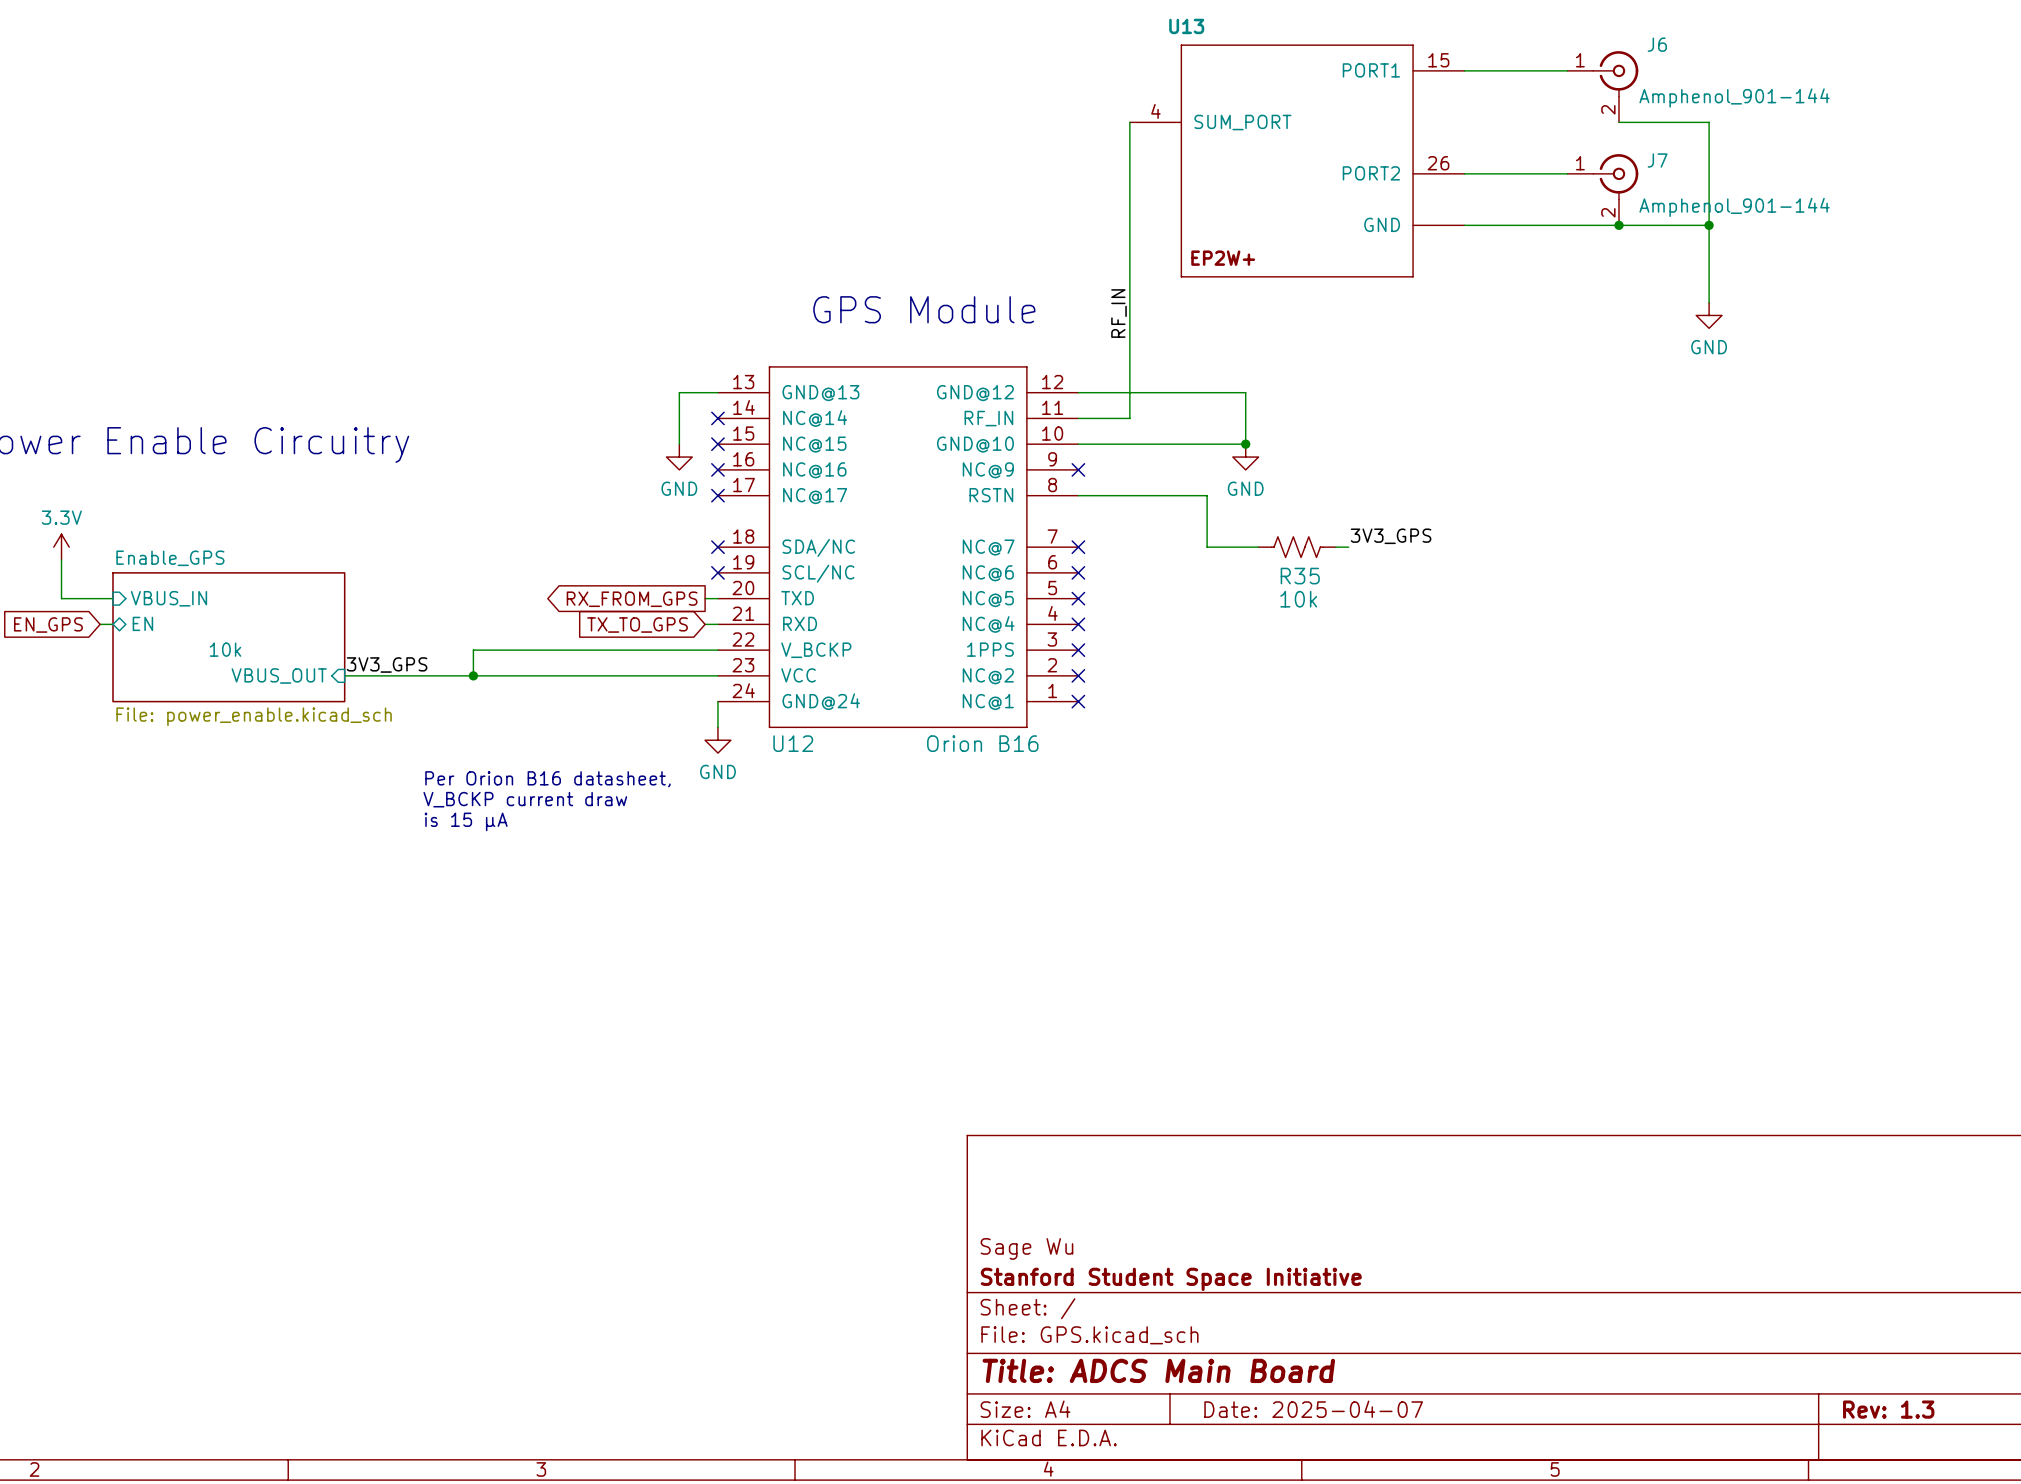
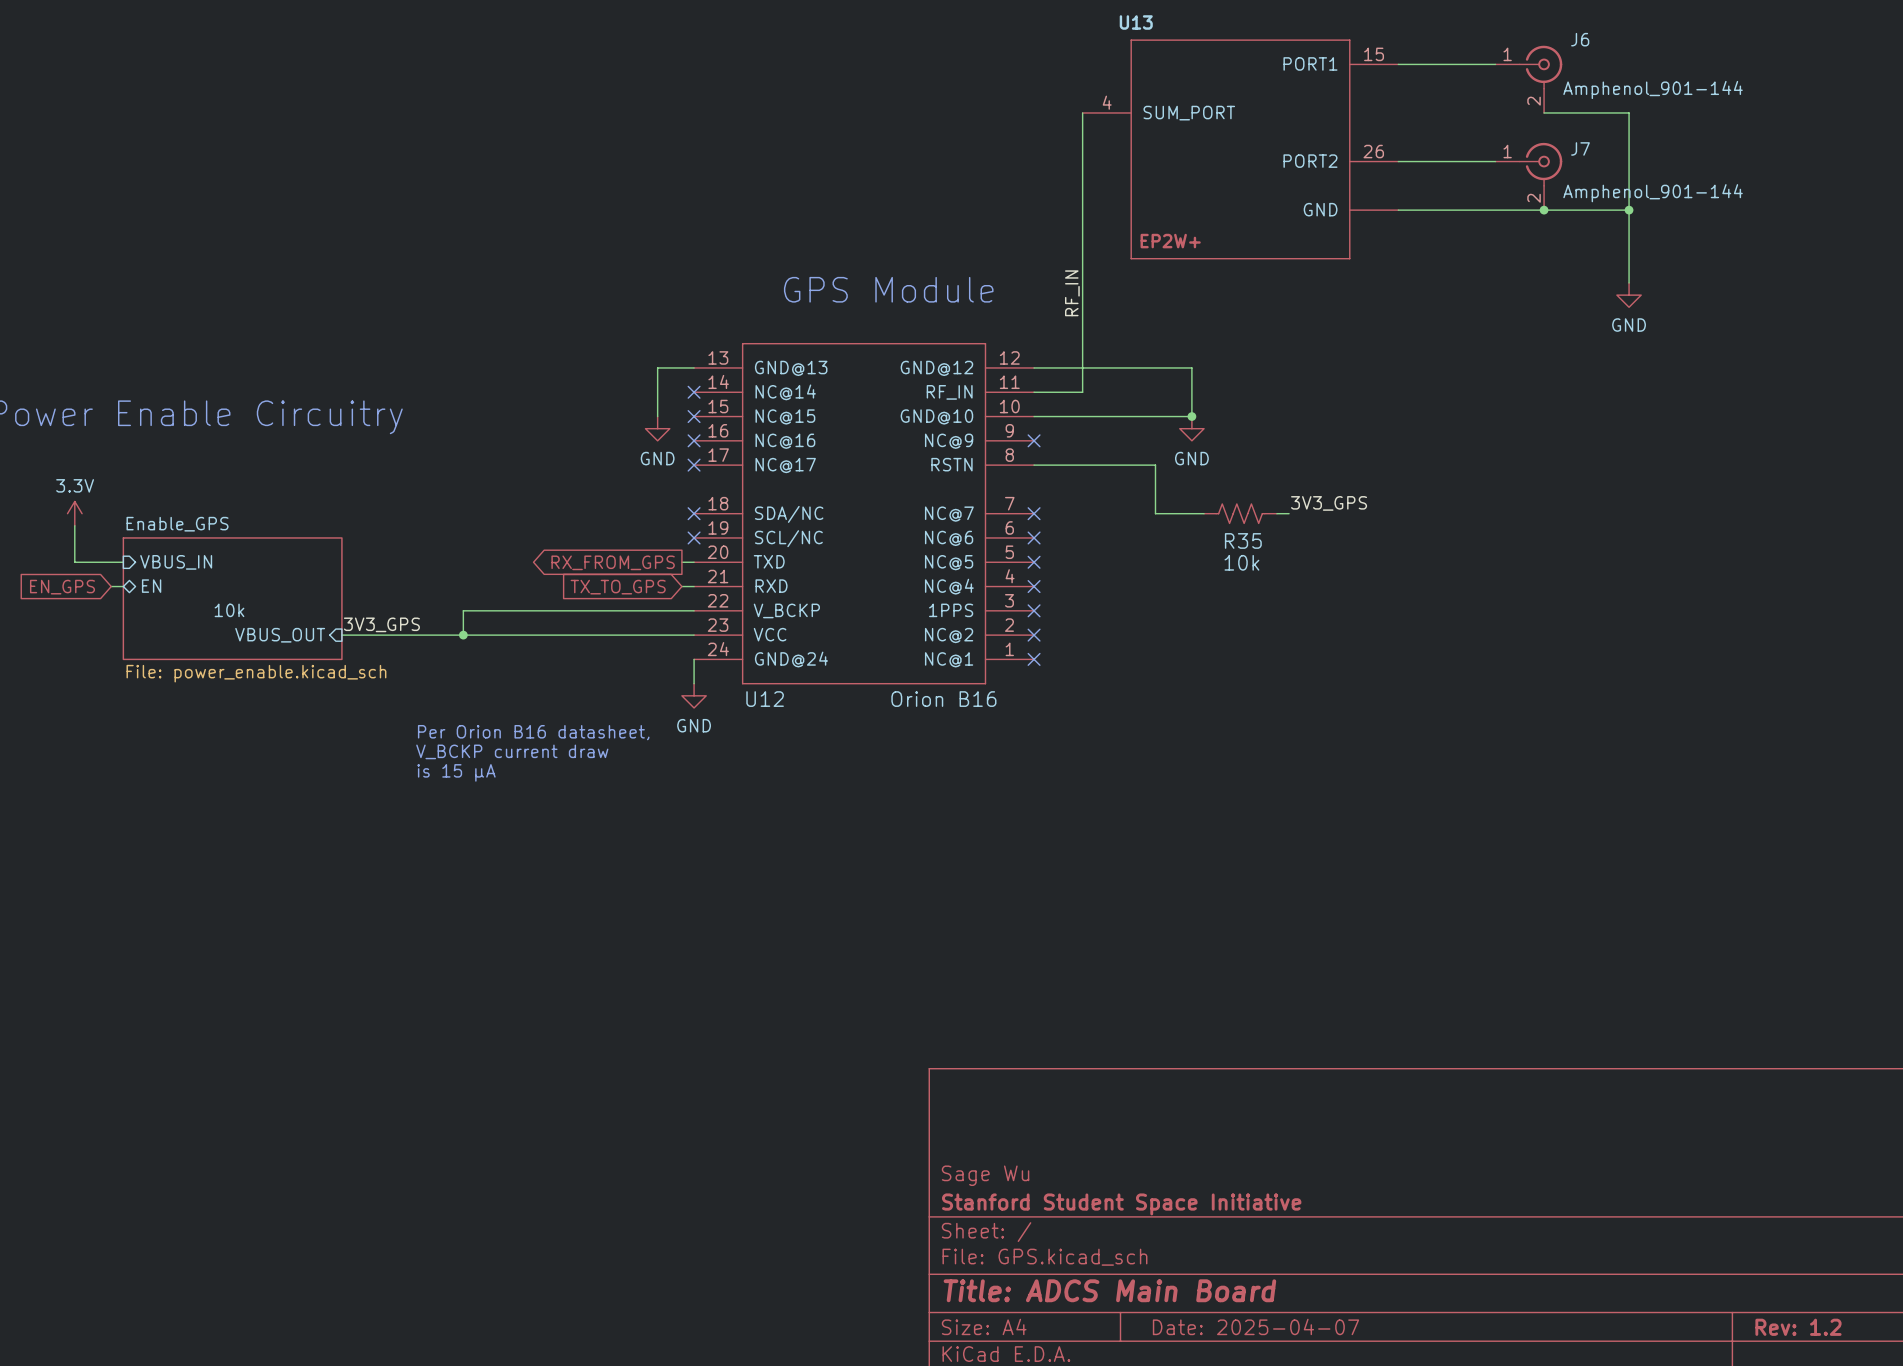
title block: Rev: 1.3 (1888, 1409) -> Rev: 1.2 (1798, 1327)

